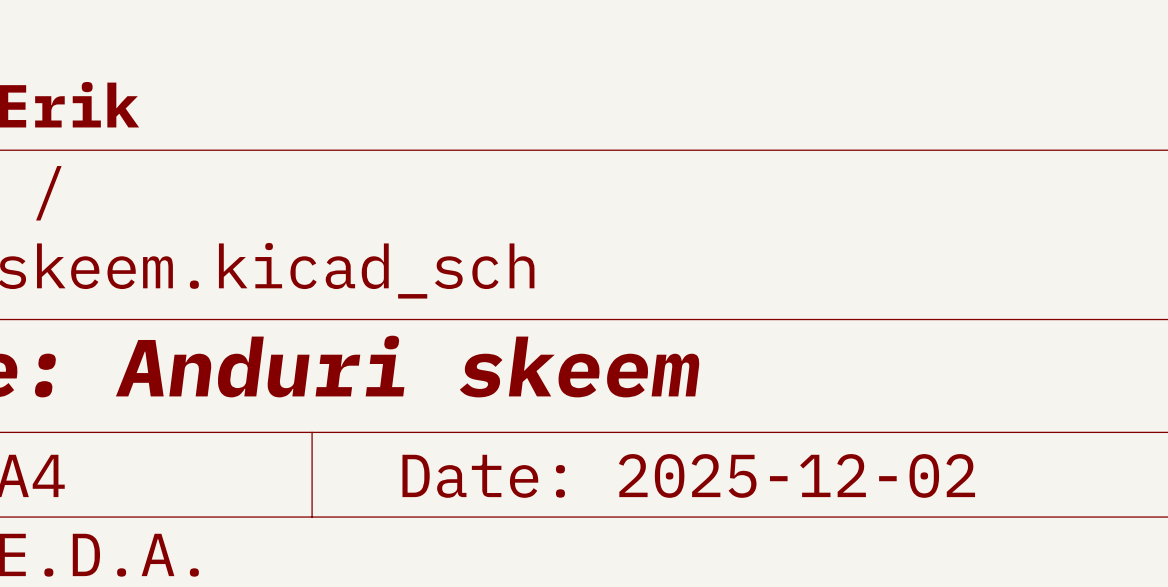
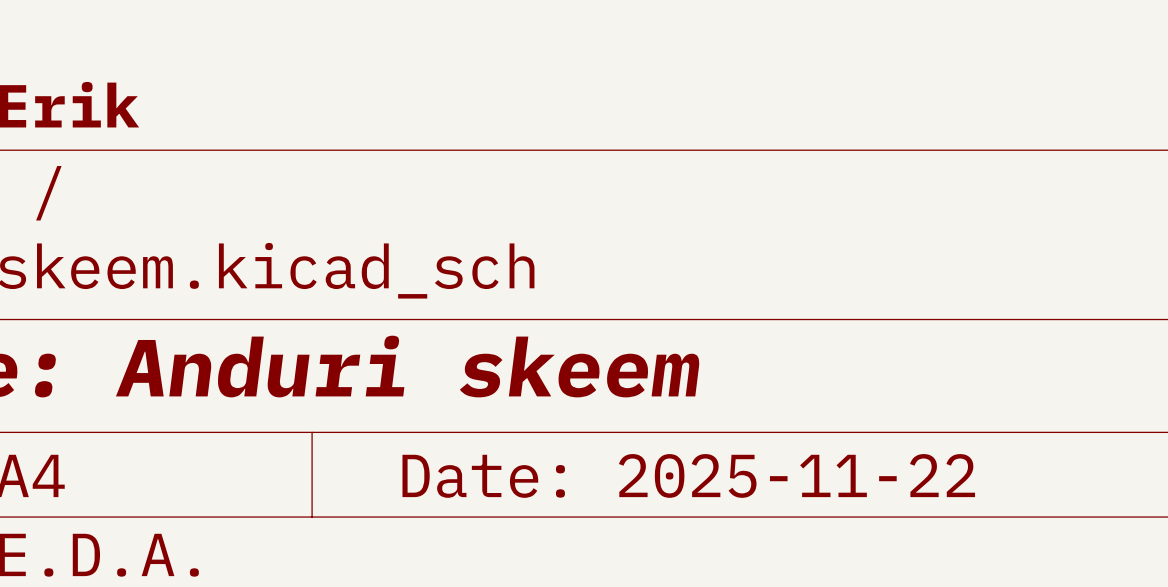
title block: Date: 2025-12-02 (688, 475) -> Date: 2025-11-22 (688, 475)

